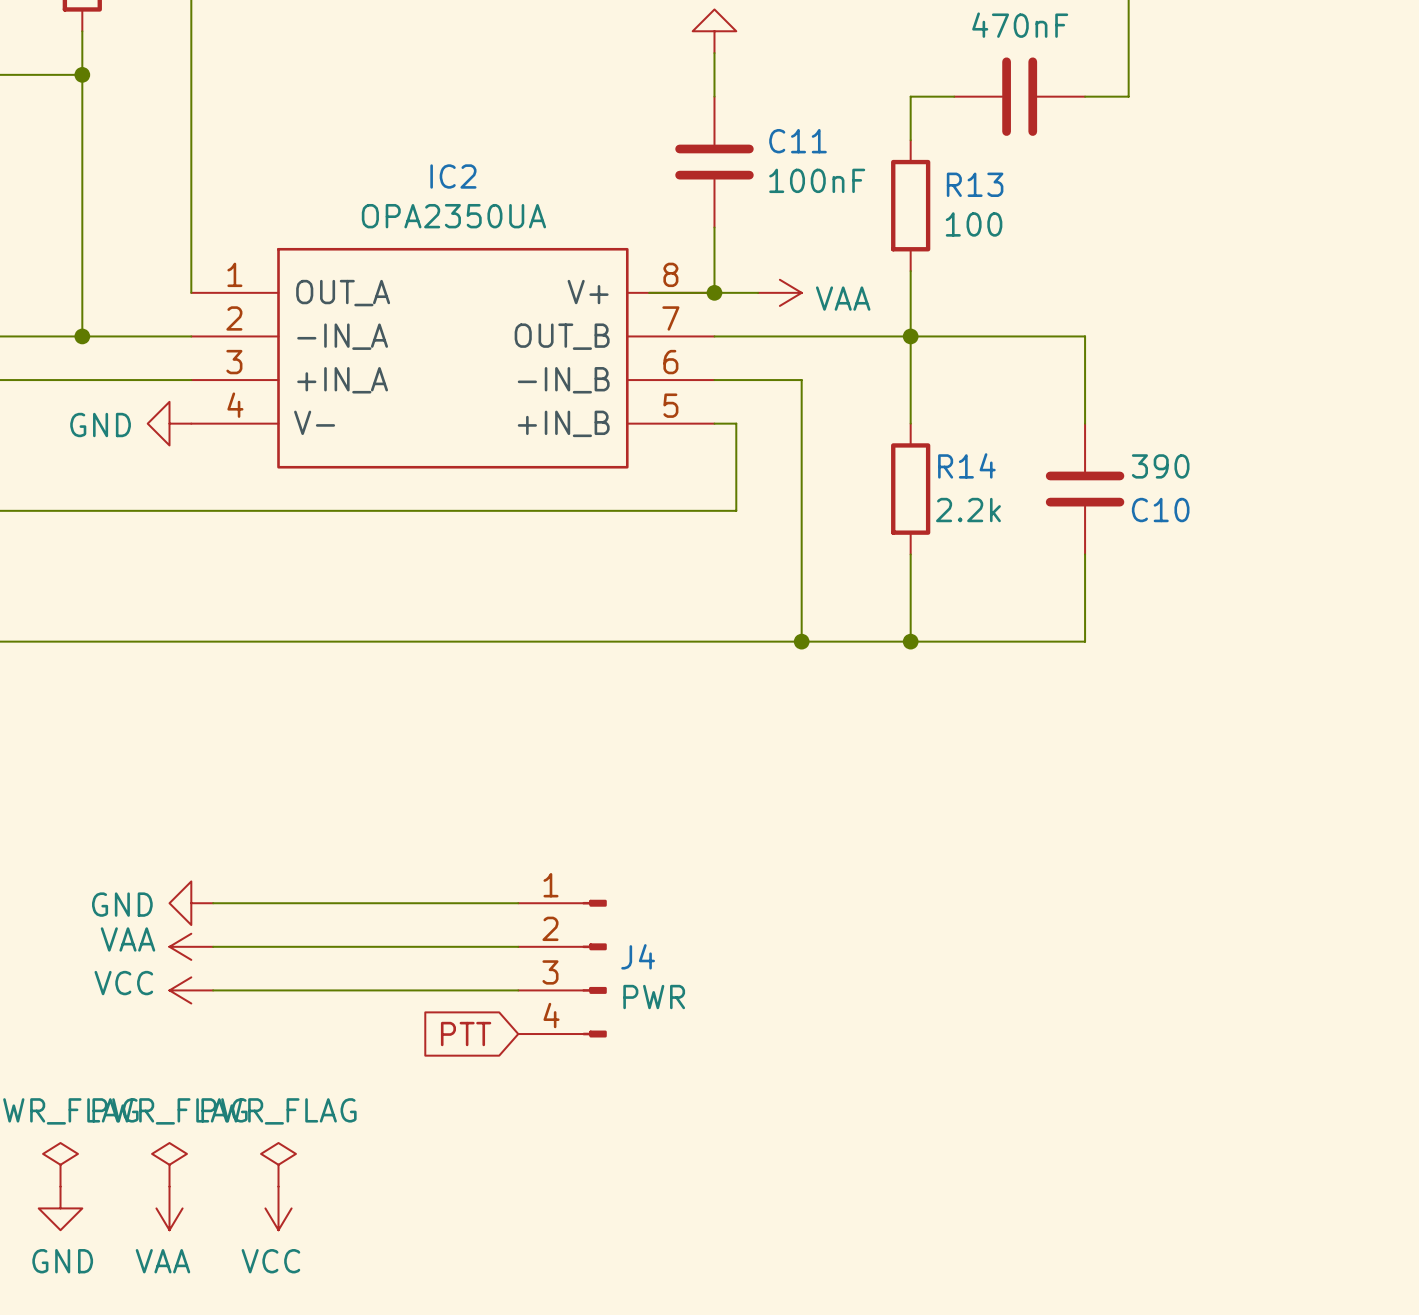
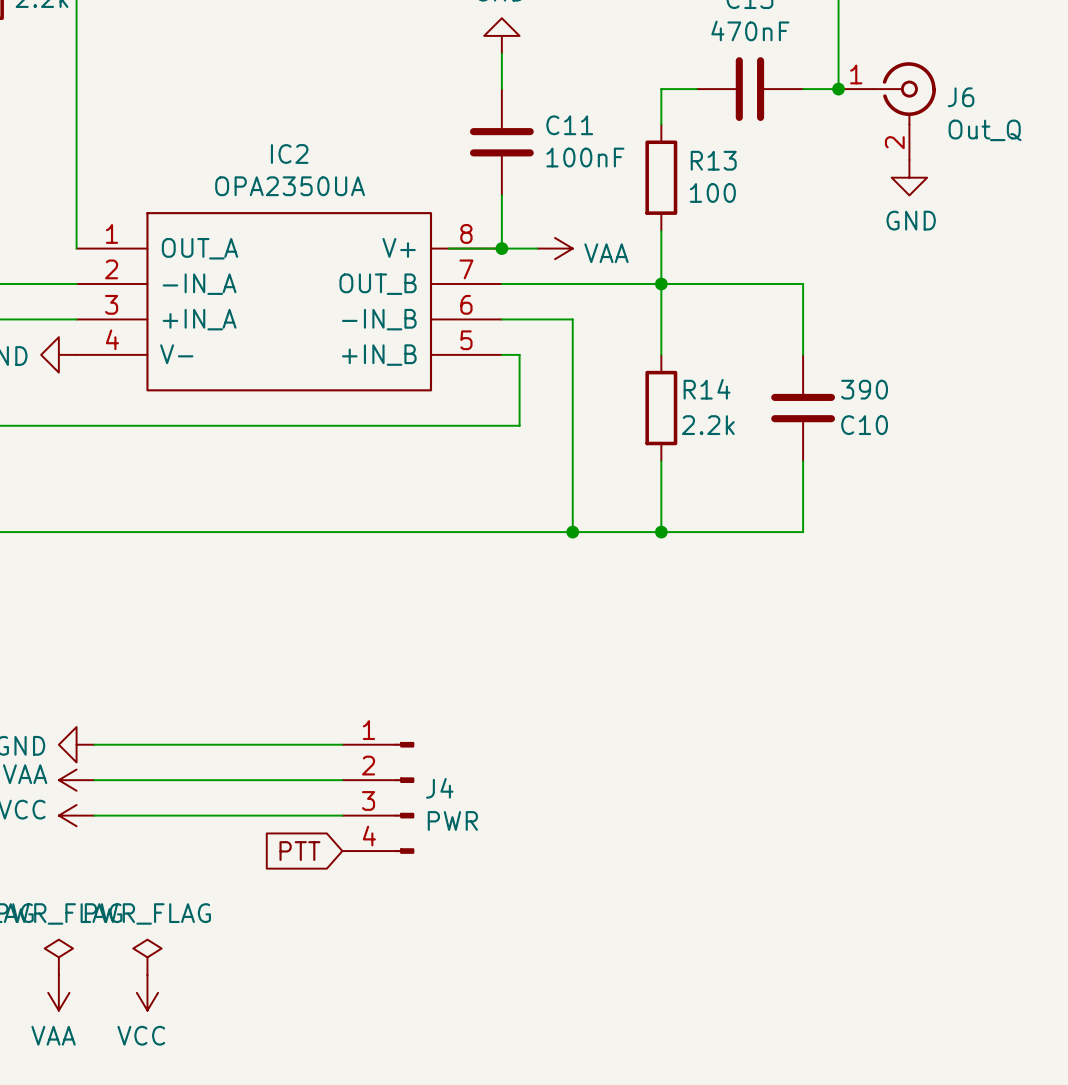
junction: none -> (838, 89)
J6: none -> Out_Q (887, 111)
power symbol: none -> GND (909, 177)

